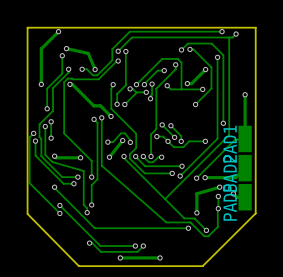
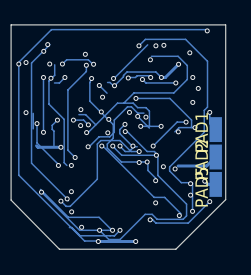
track: (58, 31) (41, 48) (41, 84) -> none
via: (58, 31) -> none
track: (222, 31) (129, 31) (112, 49) (112, 60) (97, 75) (93, 75) (86, 69) (82, 69) -> (93, 64) (88, 59) (66, 59) (62, 64)
via: (222, 31) -> none
track: none -> (206, 29) (51, 29) (19, 61) (18, 175) (84, 241) (98, 241)
track: (236, 34) (232, 37) (131, 37) (118, 51) -> none
track: (229, 37) (229, 134) (165, 199) -> none
track: (66, 48) (88, 53) (95, 69) -> none
track: none -> (49, 44) (31, 63) (31, 163) (68, 200)
track: none -> (147, 44) (114, 78)
via: none -> (138, 45)
track: (181, 49) (187, 43) (211, 43) (223, 55) (223, 123) -> none
track: (189, 49) (193, 49) (205, 61) -> (151, 56) (178, 56)
via: (118, 51) -> none
track: (125, 51) (125, 85) (117, 93) (117, 104) -> none
via: (125, 51) -> none
track: (62, 55) (62, 73) (47, 88) (47, 108) -> none
track: (217, 57) (217, 138) (180, 176) -> none
via: none -> (85, 54)
track: (118, 61) (98, 79) (67, 78) (64, 82) (64, 133) (91, 160) (91, 177) -> none
via: (118, 61) -> none
track: (175, 64) (175, 69) (156, 88) (156, 129) (151, 134) (151, 156) -> none
via: none -> (26, 62)
track: (211, 67) (211, 88) (195, 104) -> (184, 62) (187, 65) (187, 79) (173, 92) (133, 92) (124, 103)
via: none -> (18, 64)
track: (68, 69) (68, 72) (53, 88) (53, 110) (39, 124) (39, 137) (41, 138) (41, 156) (62, 177) (77, 177) -> none
via: (95, 69) -> none
via: none -> (93, 64)
track: none -> (54, 64) (54, 75) (48, 80) (48, 104) (64, 119) (64, 162) (66, 165)
track: none -> (86, 65) (86, 71) (67, 89) (67, 150) (75, 157)
via: none -> (86, 65)
track: (164, 70) (157, 70) (144, 84) -> none
via: (164, 70) -> none
track: none -> (43, 77) (43, 132)
via: none -> (43, 77)
track: none -> (64, 77) (59, 82) (54, 82)
via: none -> (64, 77)
track: none -> (150, 77) (148, 75) (128, 77)
via: none -> (150, 77)
track: none -> (161, 77) (155, 72) (126, 72) (114, 85)
via: none -> (192, 77)
via: (41, 84) -> none
track: (69, 84) (72, 84) (93, 105) (100, 105) (111, 116) -> none
track: (136, 84) (162, 58) (177, 58) (181, 62) (181, 89) -> none
via: (144, 84) -> none
track: (152, 84) (150, 98) -> none
via: (130, 88) -> none
track: none -> (99, 85) (107, 93)
via: none -> (99, 85)
via: none -> (114, 85)
track: (146, 92) (136, 92) (124, 104) -> none
via: (146, 92) -> none
track: (245, 94) (245, 138) (235, 139) (232, 141) -> (138, 45) (145, 39) (185, 39) (207, 61) (207, 107) (204, 110) (204, 132)
via: (245, 94) -> none
via: none -> (198, 88)
via: (150, 98) -> none
via: (117, 104) -> none
via: (195, 104) -> none
track: none -> (135, 98) (169, 98) (191, 120) (191, 127)
via: none -> (135, 98)
via: (47, 108) -> none
via: none -> (192, 102)
via: (111, 116) -> none
track: (101, 117) (101, 165) (166, 222) (190, 222) (204, 236) (210, 234) -> (99, 230) (108, 239) (120, 239) (145, 214) (152, 214) (157, 219) (183, 219)
track: (94, 119) (97, 122) (97, 179) (91, 185) (91, 204) -> none
via: (94, 119) -> none
via: none -> (26, 112)
via: none -> (101, 111)
via: none -> (129, 112)
track: none -> (209, 112) (209, 123) (215, 129)
via: none -> (209, 112)
via: (51, 121) -> none
track: none -> (143, 113) (137, 113) (131, 106) (127, 106) (114, 120) (114, 132) (109, 136) (99, 136) (89, 146)
track: none -> (78, 114) (85, 114) (95, 124)
via: (223, 123) -> none
track: (170, 125) (181, 136) (181, 141) -> none
track: (45, 126) (45, 154) (52, 162) (83, 171) (83, 204) (87, 208) (87, 212) -> none
via: (45, 126) -> none
track: none -> (57, 120) (52, 125) (53, 145)
via: none -> (57, 120)
track: none -> (73, 120) (83, 120) (88, 124)
via: none -> (73, 120)
via: none -> (108, 119)
track: none -> (186, 122) (177, 122) (153, 146)
via: none -> (186, 122)
track: none -> (37, 123) (37, 143) (59, 165)
via: none -> (37, 123)
track: (33, 133) (29, 137) (29, 183) (59, 213) -> none
via: (33, 133) -> none
via: none -> (88, 124)
track: none -> (125, 124) (119, 129) (119, 133) (132, 146)
via: none -> (125, 124)
via: none -> (80, 125)
via: none -> (140, 126)
track: none -> (149, 126) (149, 111) (145, 107) (137, 107) (133, 103) (117, 103) (87, 132)
track: none -> (161, 126) (140, 126)
via: none -> (161, 126)
track: (156, 136) (163, 136) (173, 147) (183, 147) (189, 141) (205, 141) -> none
via: (156, 136) -> none
track: none -> (195, 127) (179, 127) (174, 131)
via: none -> (195, 127)
via: (174, 137) -> none
via: (51, 138) -> none
track: (122, 140) (109, 157) -> none
via: (122, 140) -> none
track: (35, 141) (35, 155) (63, 183) (73, 183) -> none
via: (35, 141) -> none
via: none -> (43, 132)
via: none -> (125, 131)
via: (168, 141) -> none
via: (181, 141) -> none
track: (107, 142) (113, 142) (120, 133) (125, 133) (130, 142) -> none
via: (54, 156) -> none
track: (124, 156) (184, 218) (194, 218) (206, 230) -> none
track: none -> (102, 146) (154, 197) (164, 197) (181, 213)
via: (151, 156) -> none
via: none -> (132, 146)
via: none -> (153, 146)
via: (161, 157) -> none
track: none -> (139, 151) (130, 151) (120, 140) (100, 140) (97, 144) (97, 179) (70, 206) (66, 206) (60, 201)
via: none -> (139, 151)
via: none -> (75, 157)
via: none -> (139, 162)
track: none -> (147, 162) (147, 170) (155, 178) (155, 180)
via: (180, 176) -> none
via: (205, 177) -> none
via: none -> (163, 166)
track: none -> (170, 166) (169, 170) (181, 182) (192, 183) (192, 211)
via: (196, 178) -> none
via: none -> (175, 168)
via: (73, 183) -> none
track: (54, 187) (94, 228) (188, 228) -> none
via: (54, 187) -> none
track: (219, 187) (196, 193) (196, 212) -> none
via: (219, 187) -> none
via: none -> (155, 180)
track: (218, 196) (217, 226) (214, 230) -> (125, 131) (147, 151) (154, 151) (157, 155) (157, 175) (186, 204) (186, 215)
track: none -> (40, 189) (68, 217) (99, 217) (112, 230)
via: (196, 212) -> none
via: (59, 213) -> none
via: none -> (60, 201)
track: none -> (209, 201) (188, 223) (155, 223) (150, 219)
via: none -> (209, 201)
via: none -> (155, 202)
via: none -> (192, 211)
via: none -> (71, 211)
via: (188, 228) -> none
via: none -> (150, 219)
via: none -> (81, 227)
via: (89, 243) -> none
via: none -> (99, 230)

